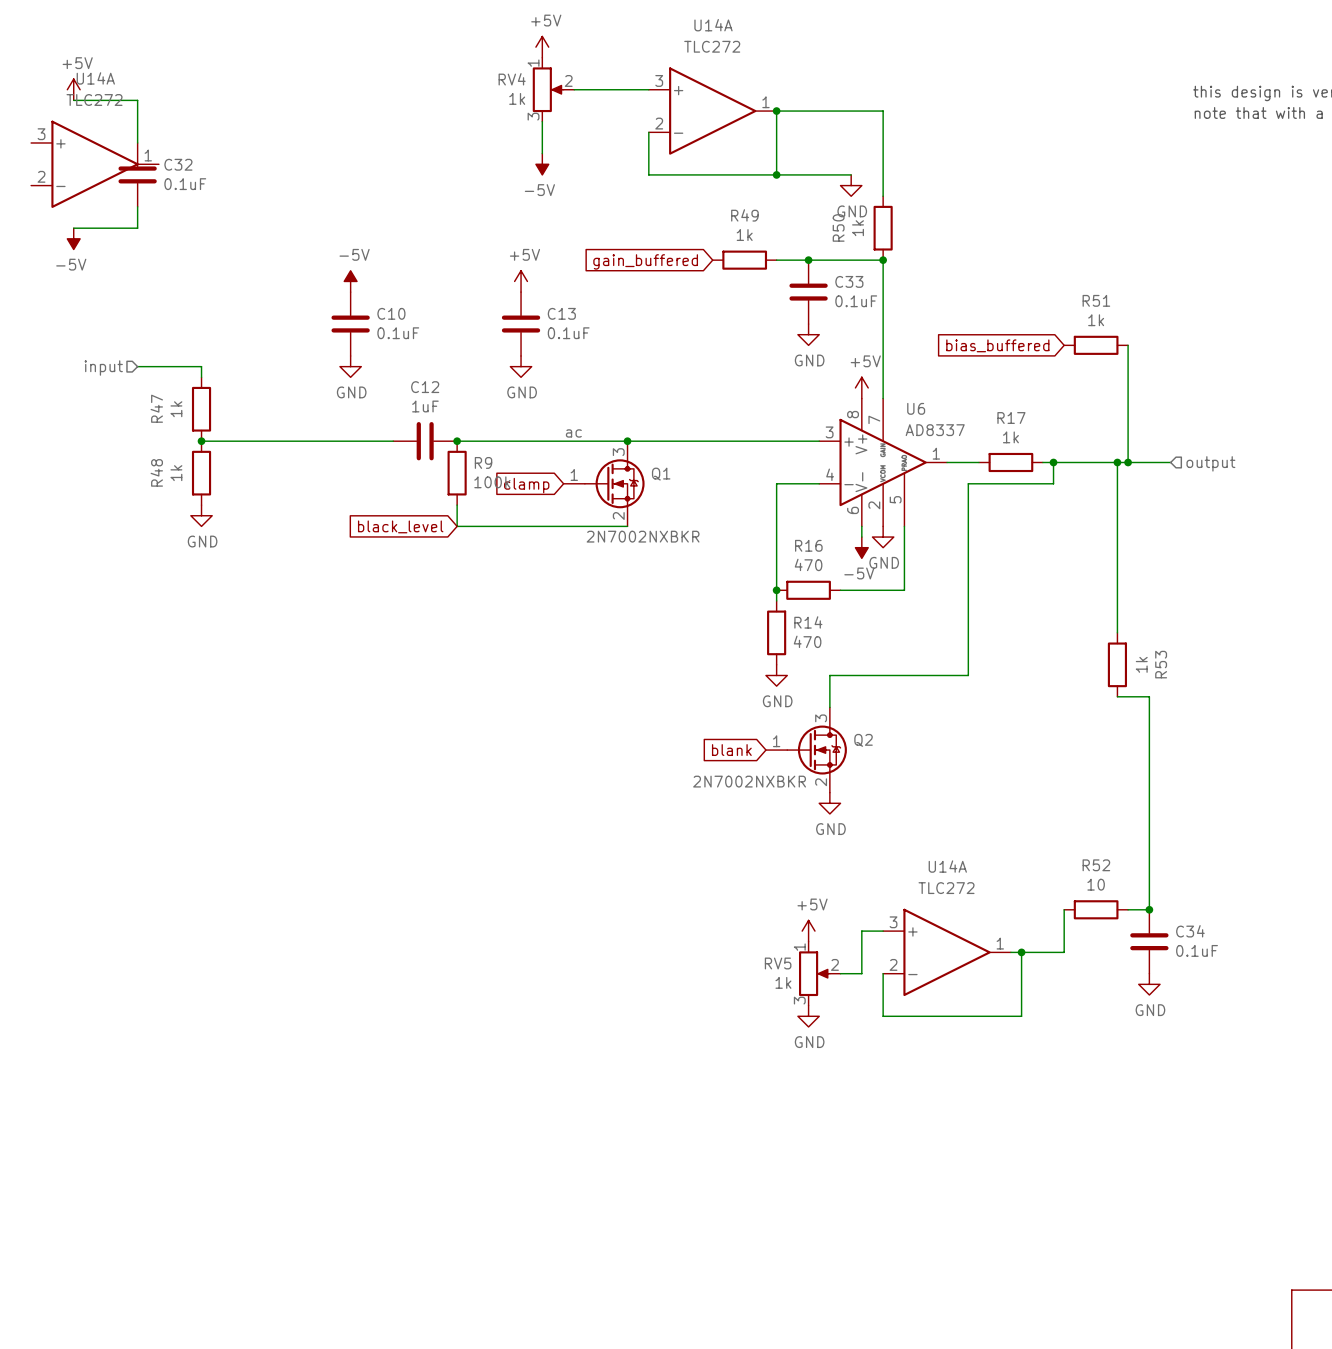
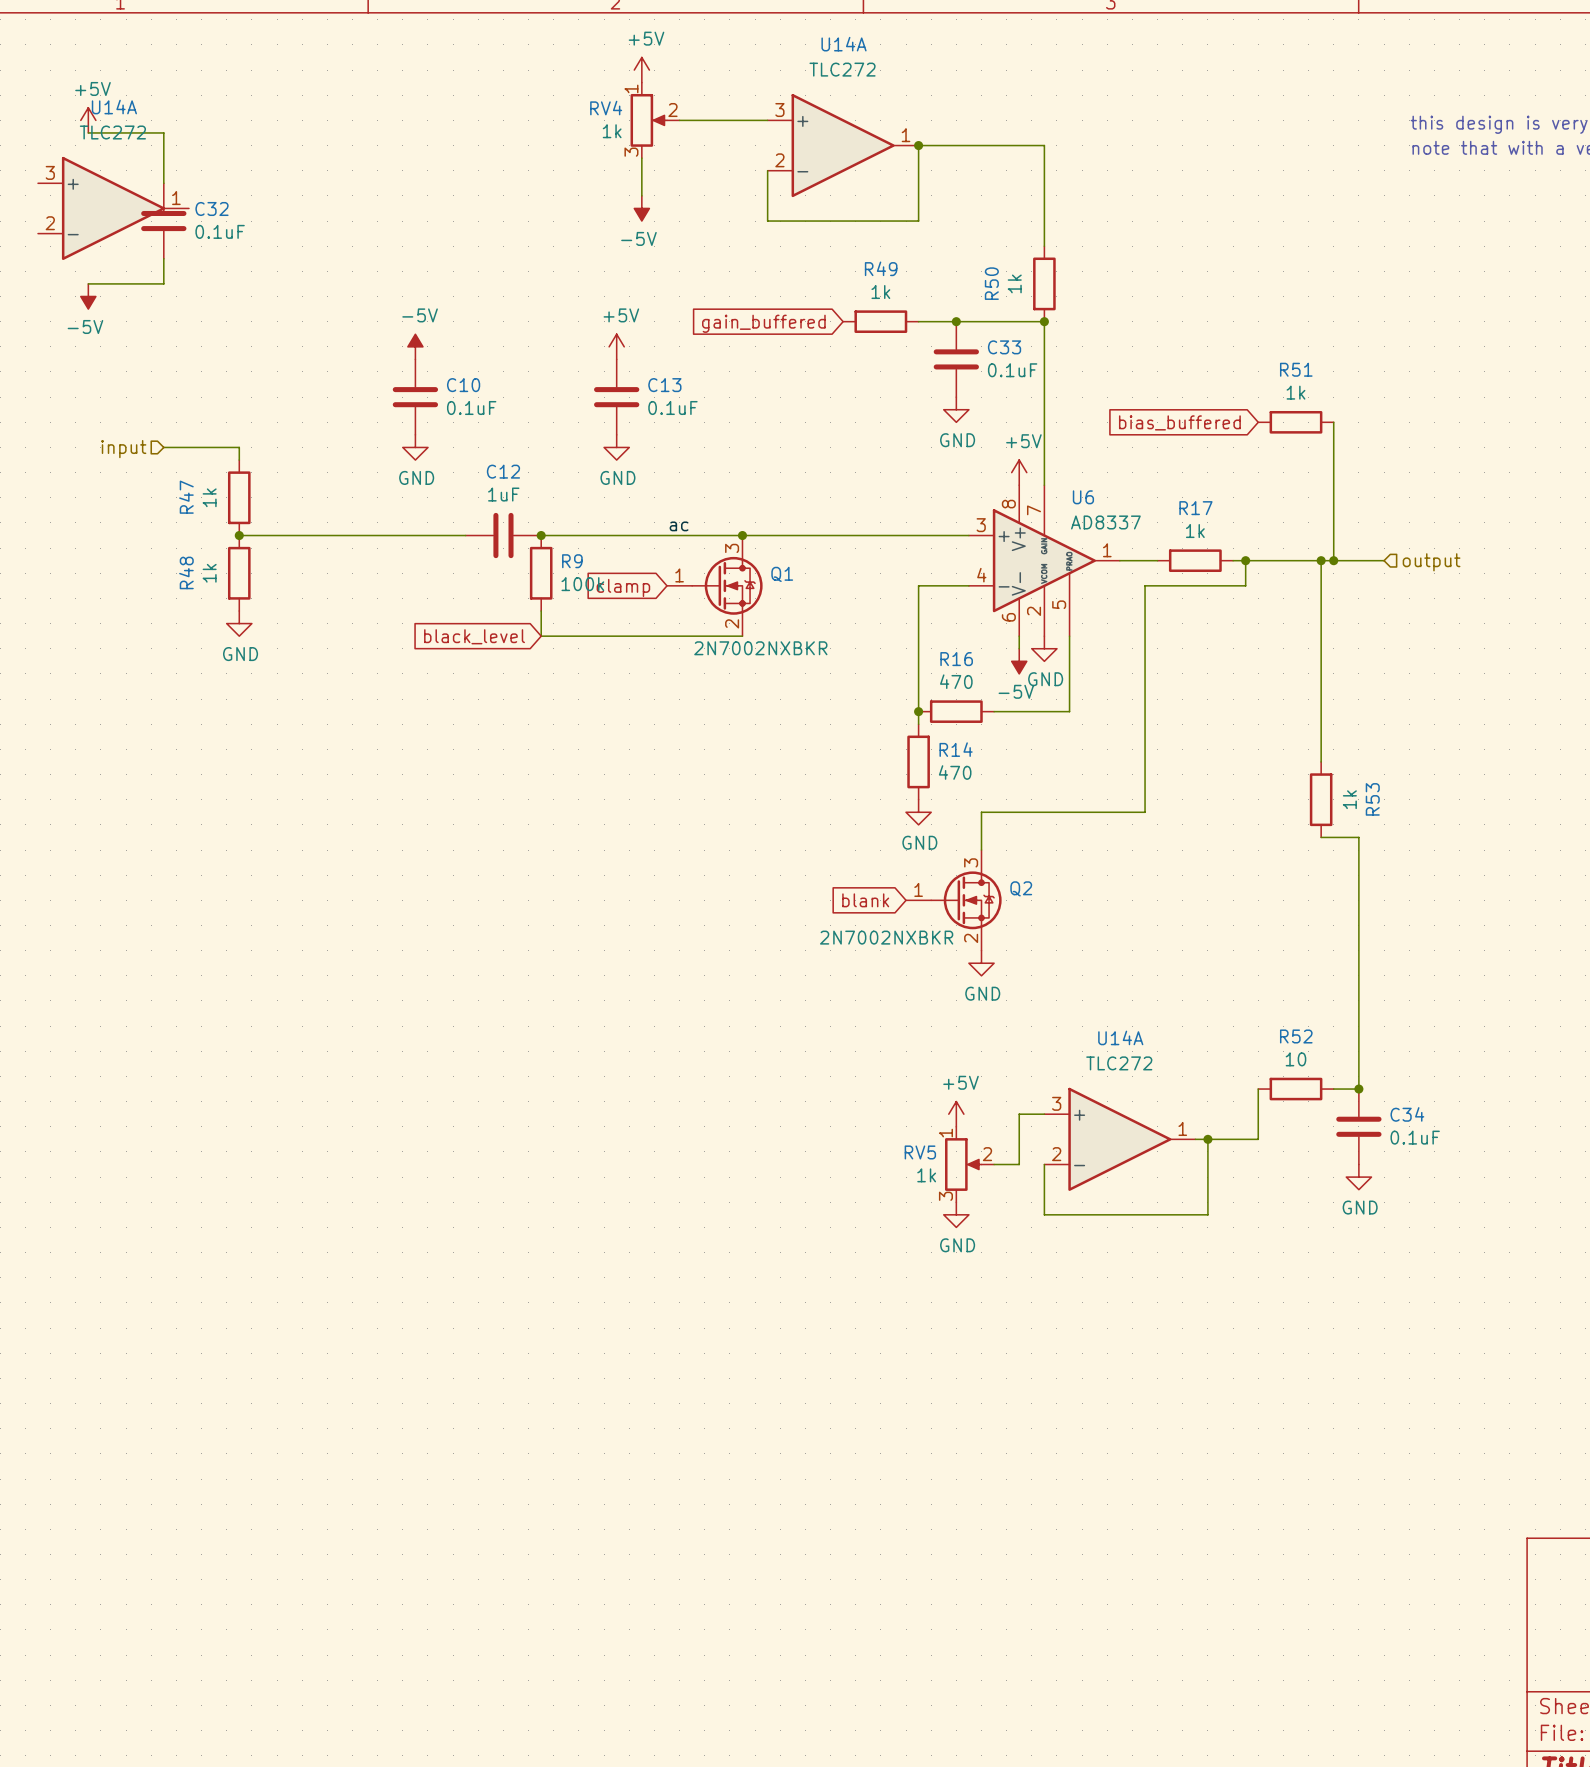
wire: (776, 174) (851, 174) -> none
junction: (776, 174) -> none
power symbol: GND (851, 185) -> none

